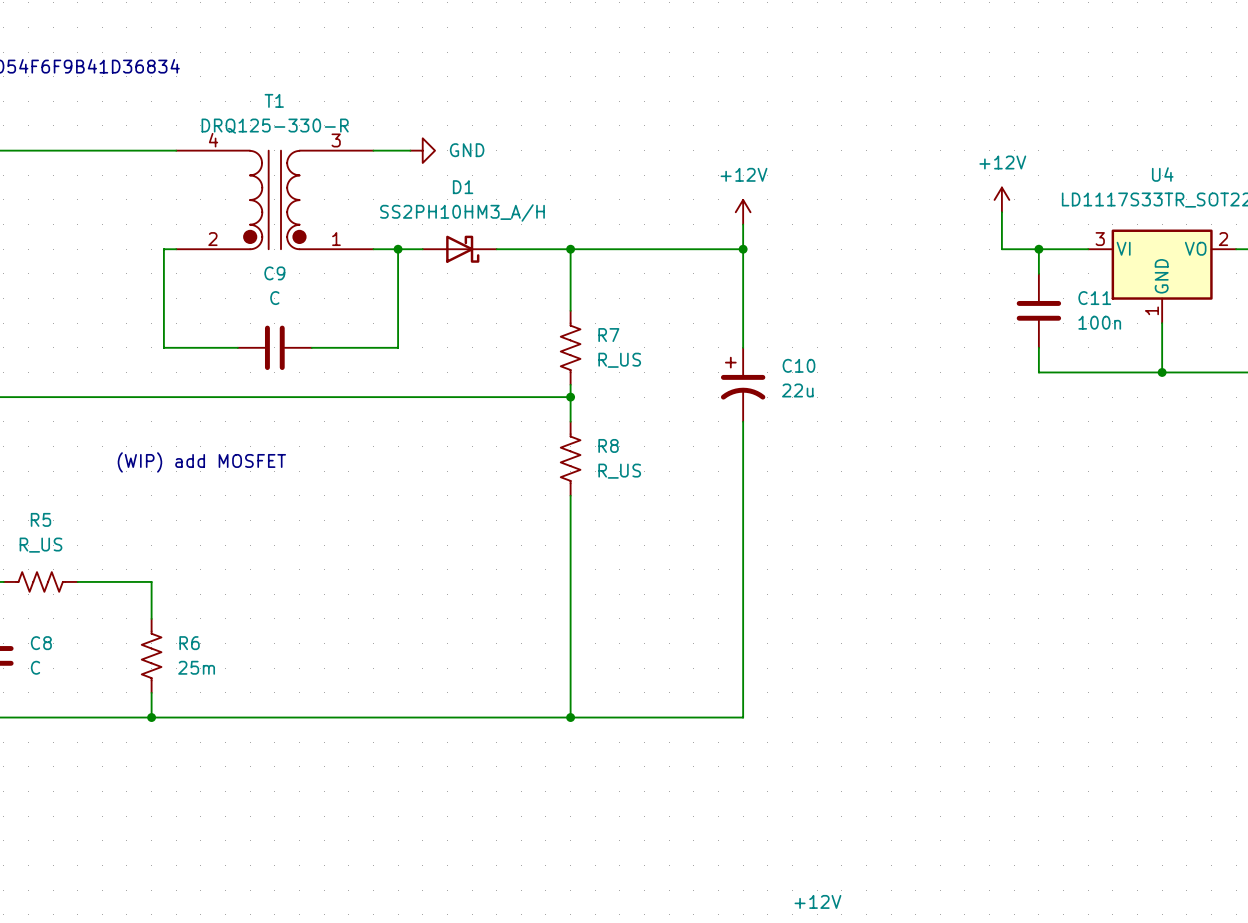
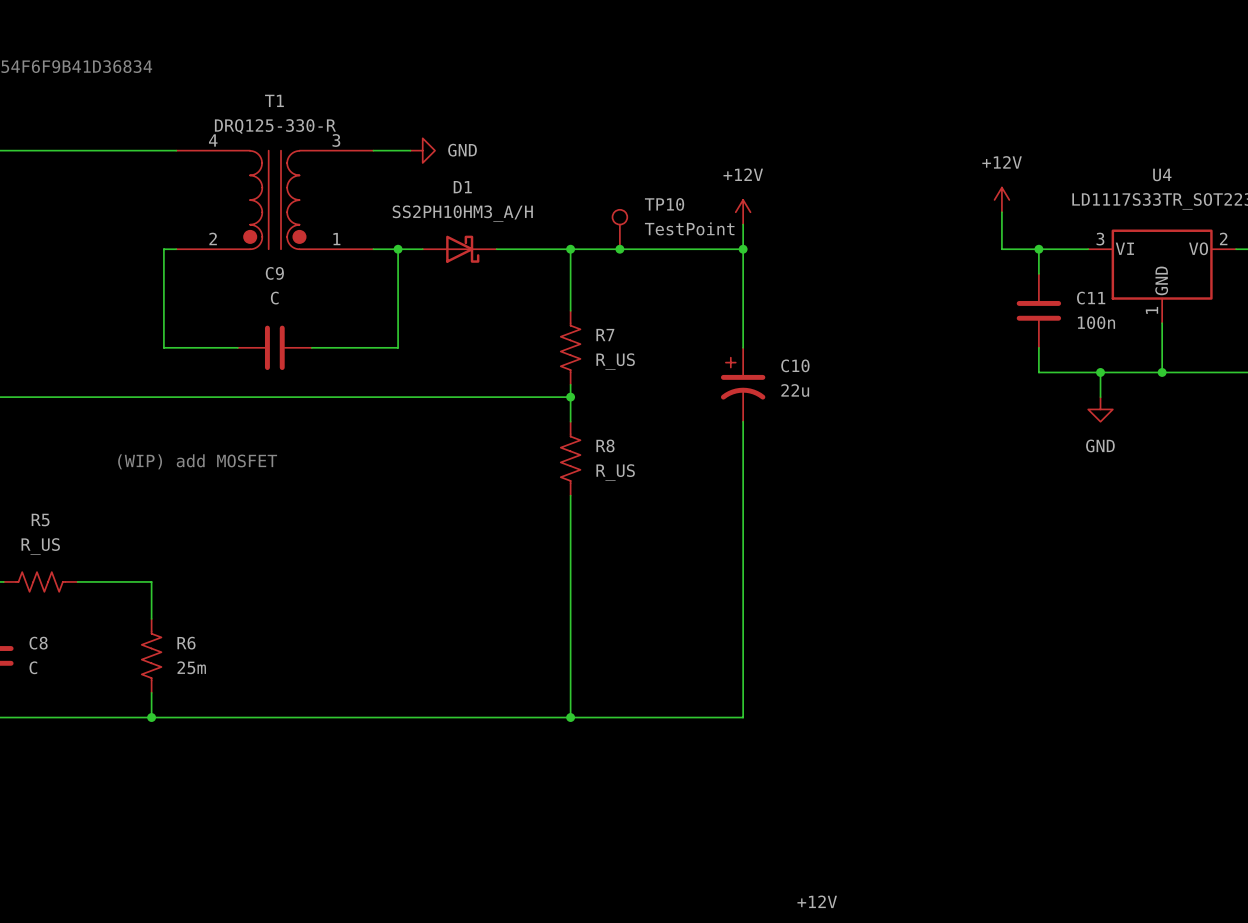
TP10: none -> TestPoint (619, 229)
junction: none -> (619, 249)
wire: none -> (1100, 372) (1100, 397)
junction: none -> (1100, 372)
power symbol: none -> GND (1100, 409)

